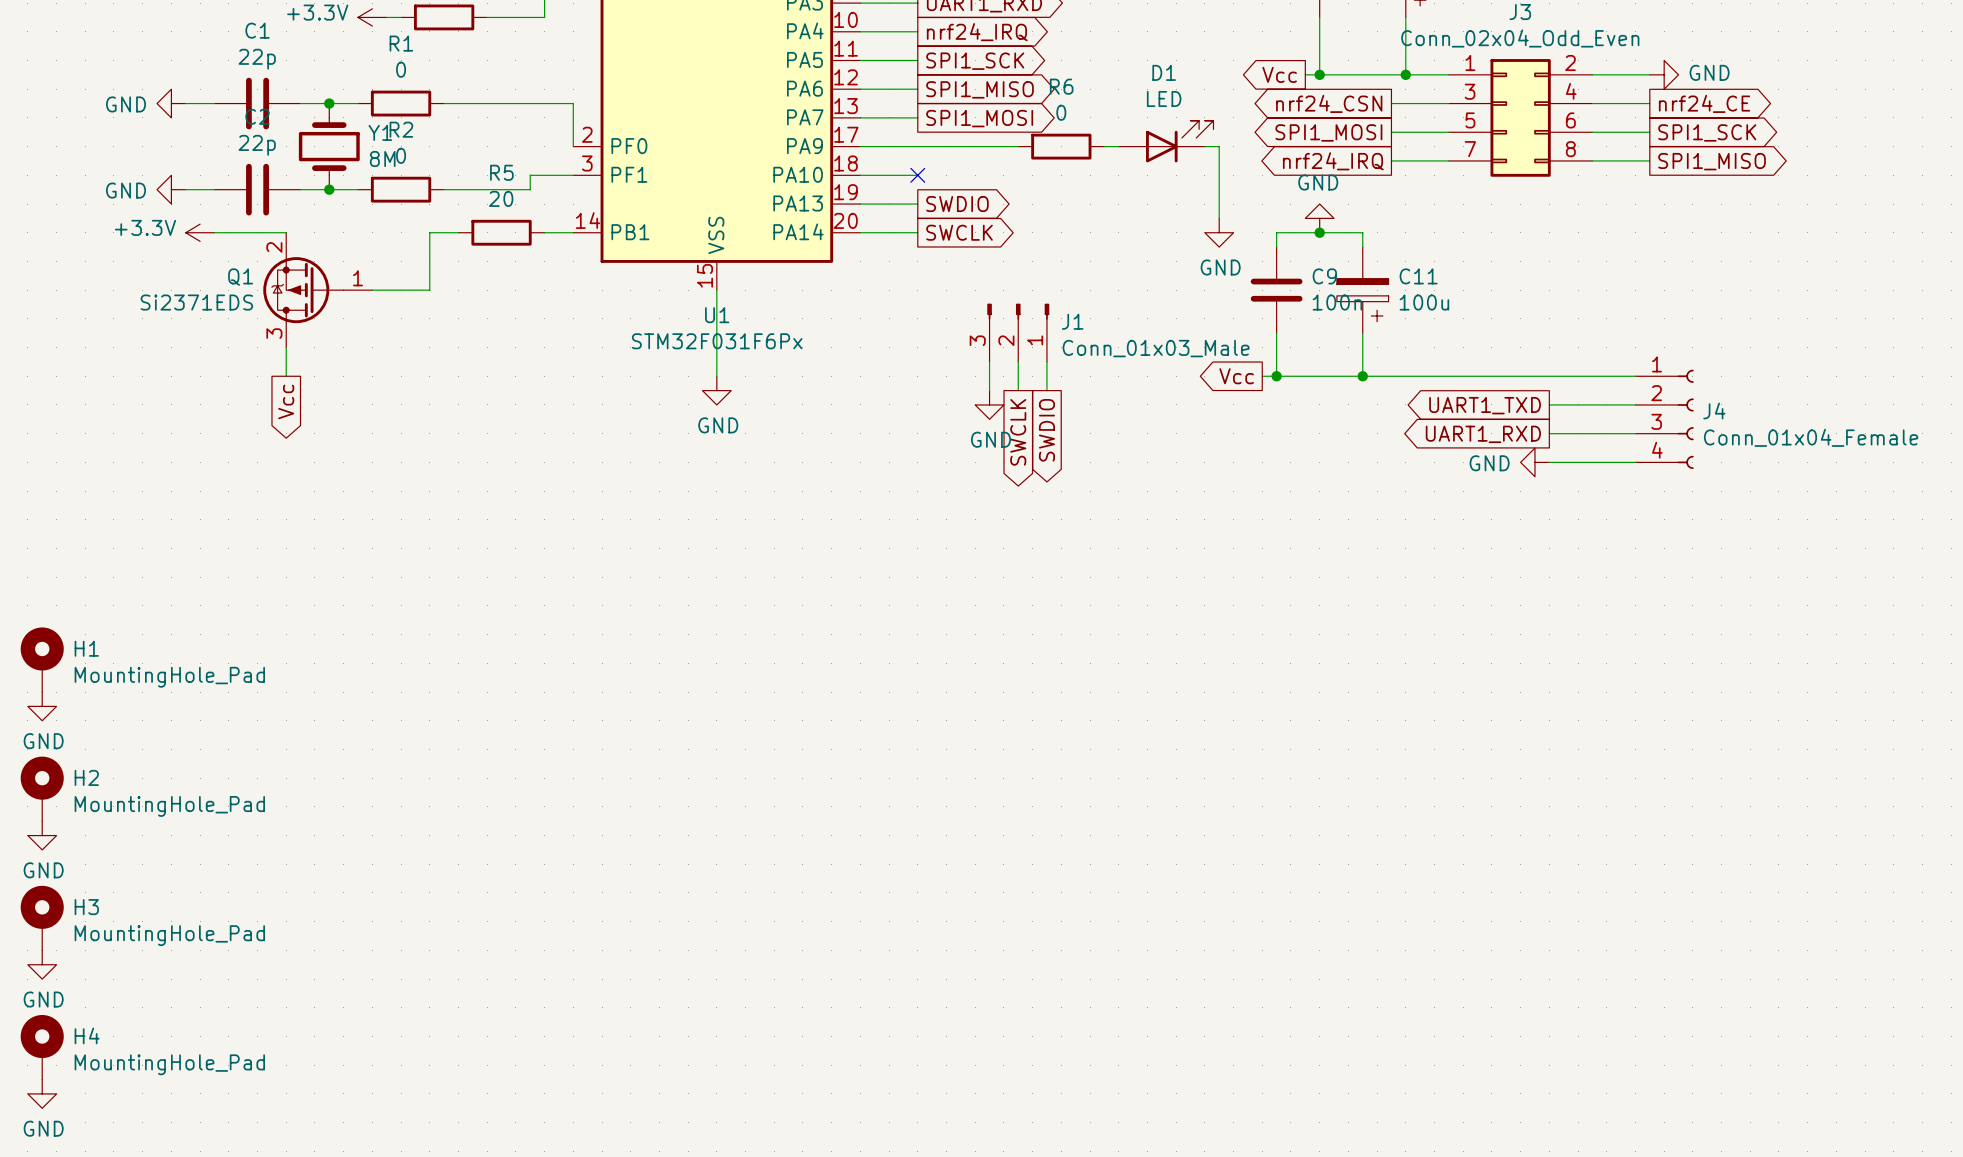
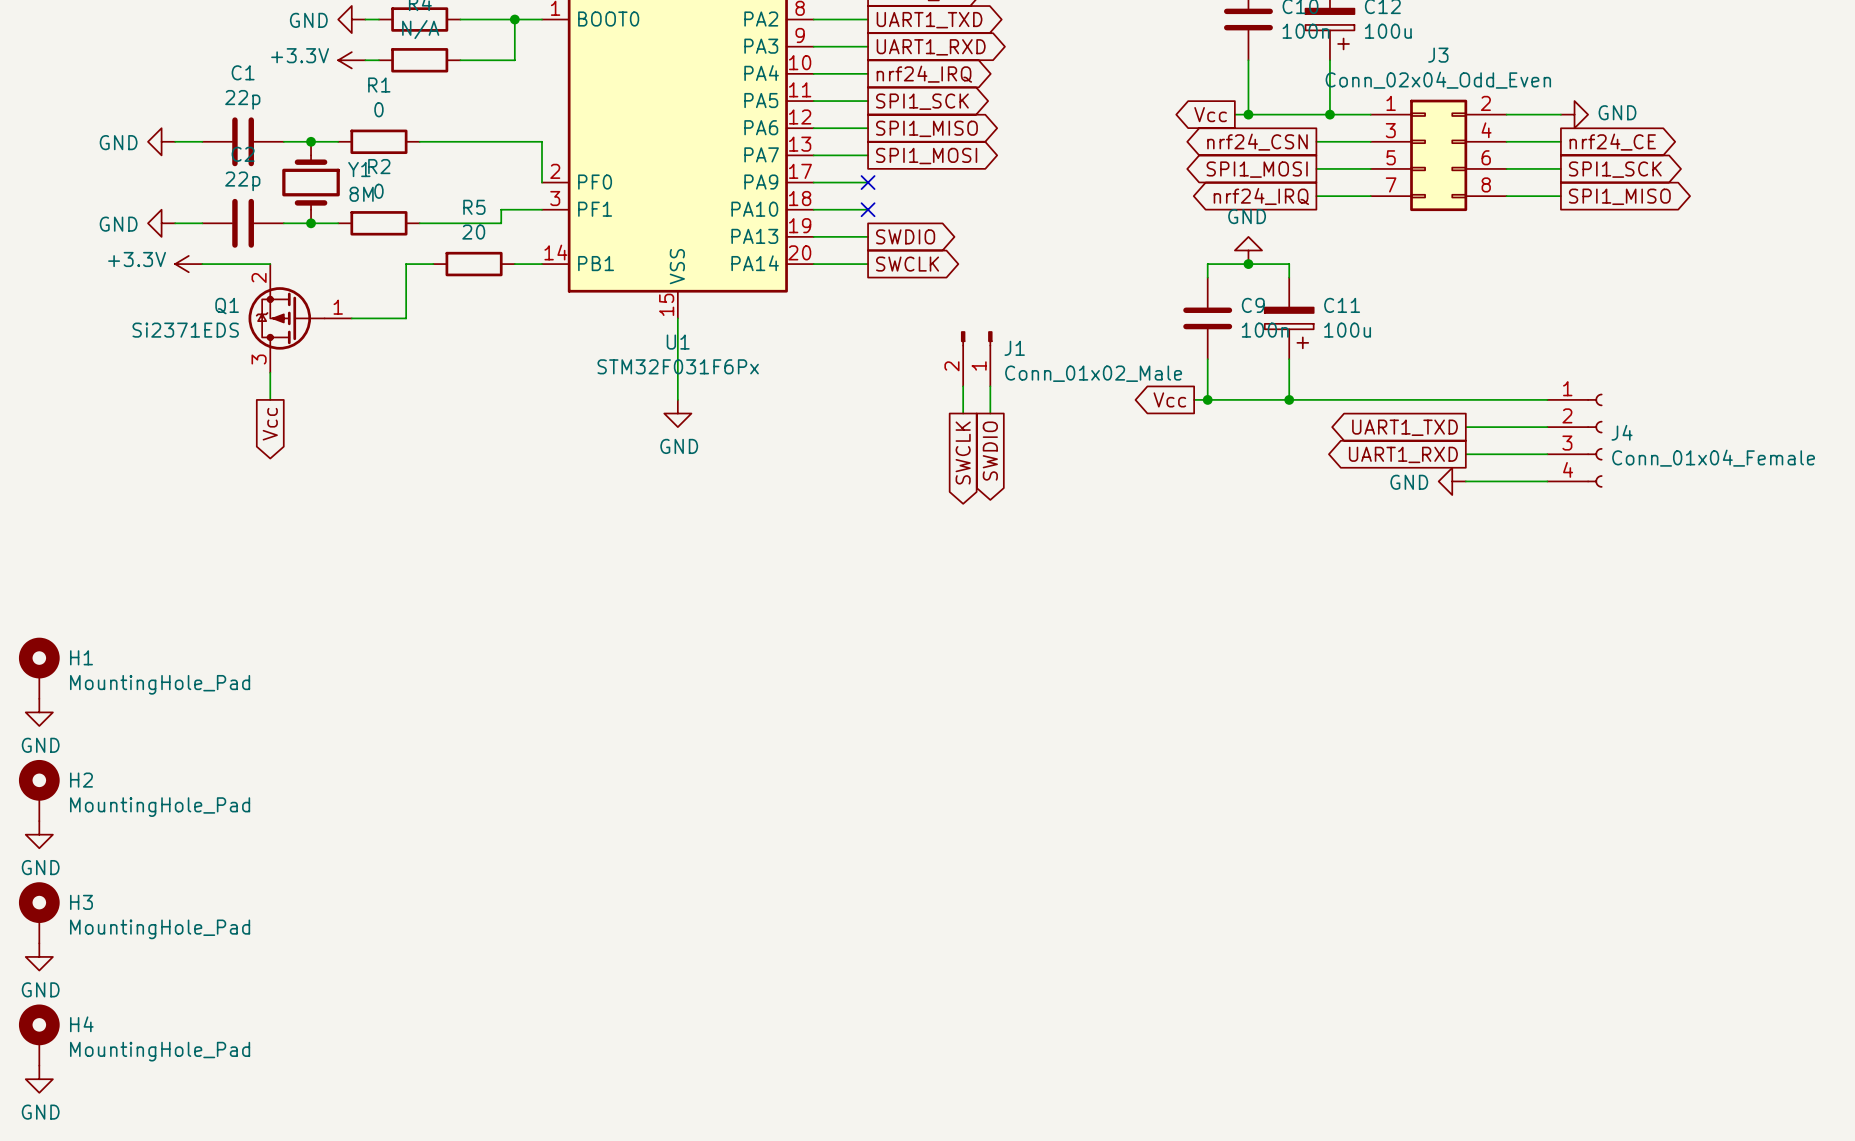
D1: LED (1166, 141) -> none
wire: (917, 146) (1018, 146) -> none
no-connect mark: none -> (868, 182)
R6: 0 (1061, 146) -> none
wire: (1104, 146) (1118, 146) -> none
wire: (1204, 146) (1219, 146) (1219, 218) -> none
power symbol: GND (1219, 232) -> none
J1 symbol: [987, 303, 1050, 362] -> [960, 331, 993, 387]
J1 value: Conn_01x03_Male (1156, 348) -> Conn_01x02_Male (1093, 373)
wire: (989, 361) (989, 390) -> none
power symbol: GND (989, 404) -> none

